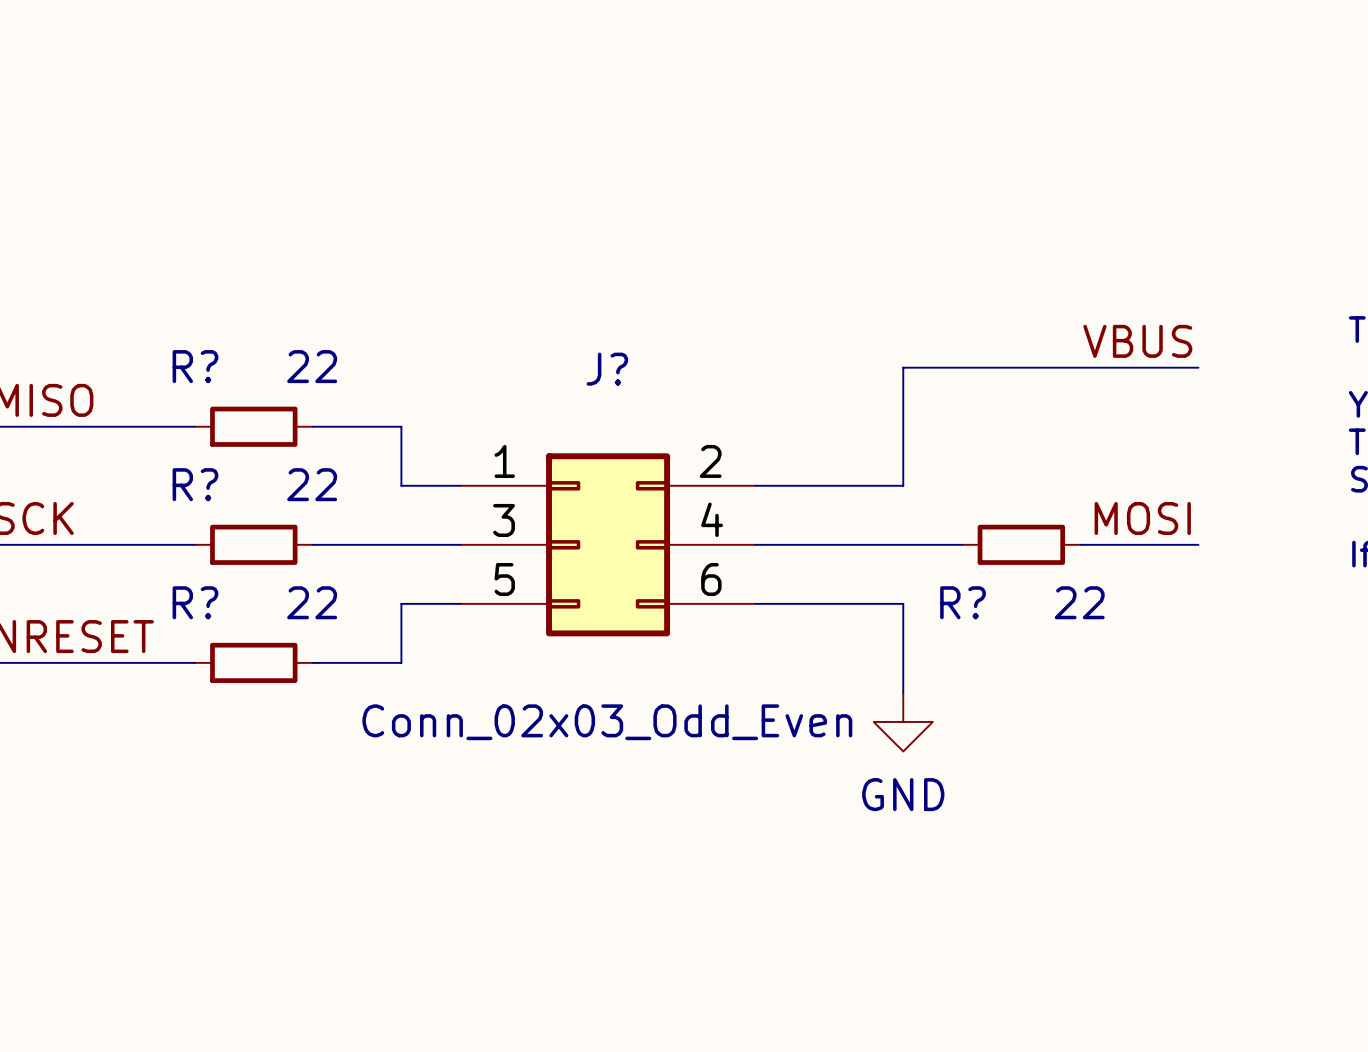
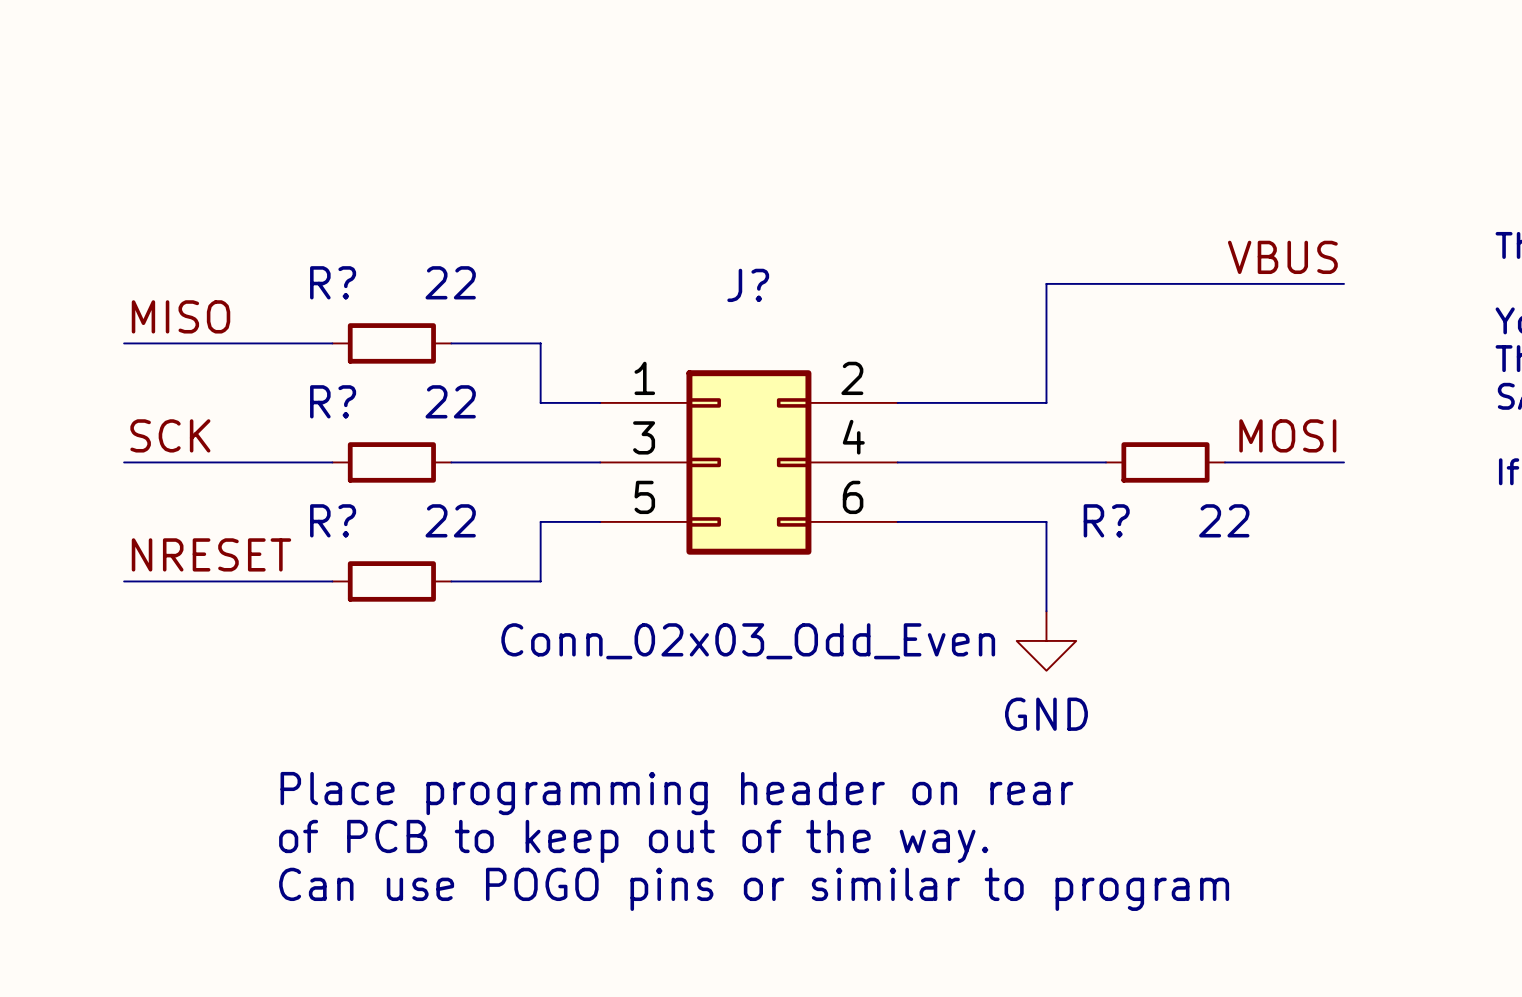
text: none -> Place programming header on rear (676, 793)
text: none -> of PCB to keep out of the way. (633, 841)
text: none -> Can use POGO pins or similar to program (754, 889)

